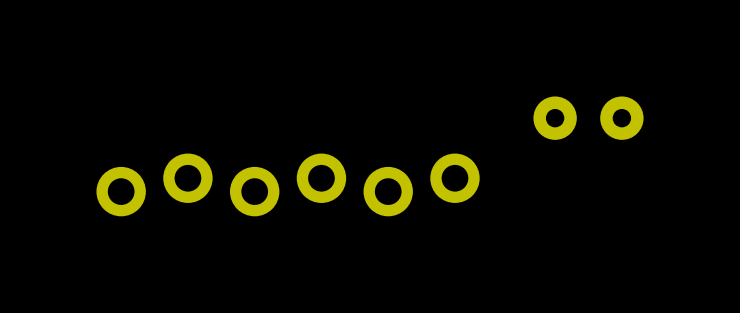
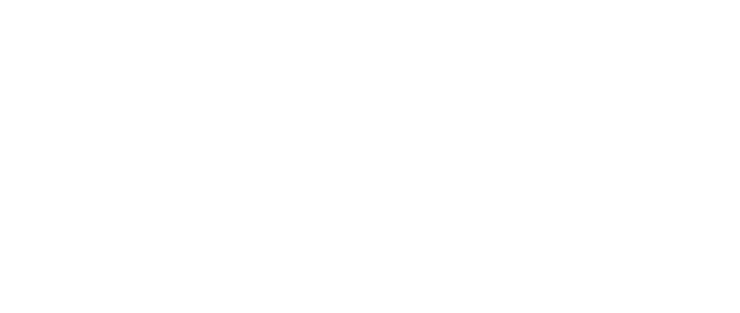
part: (588, 118) -> none
part: (288, 184) -> none

